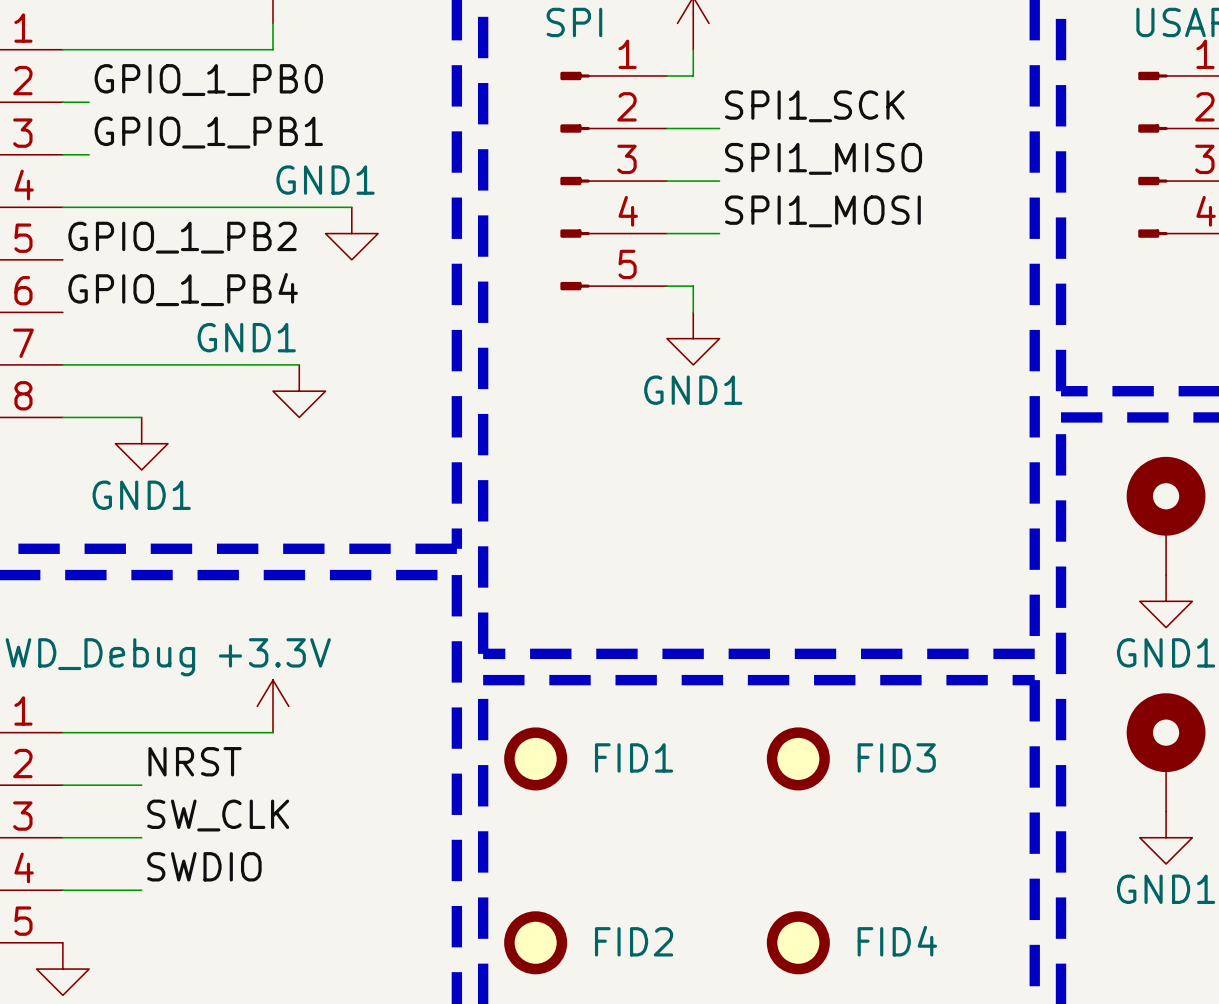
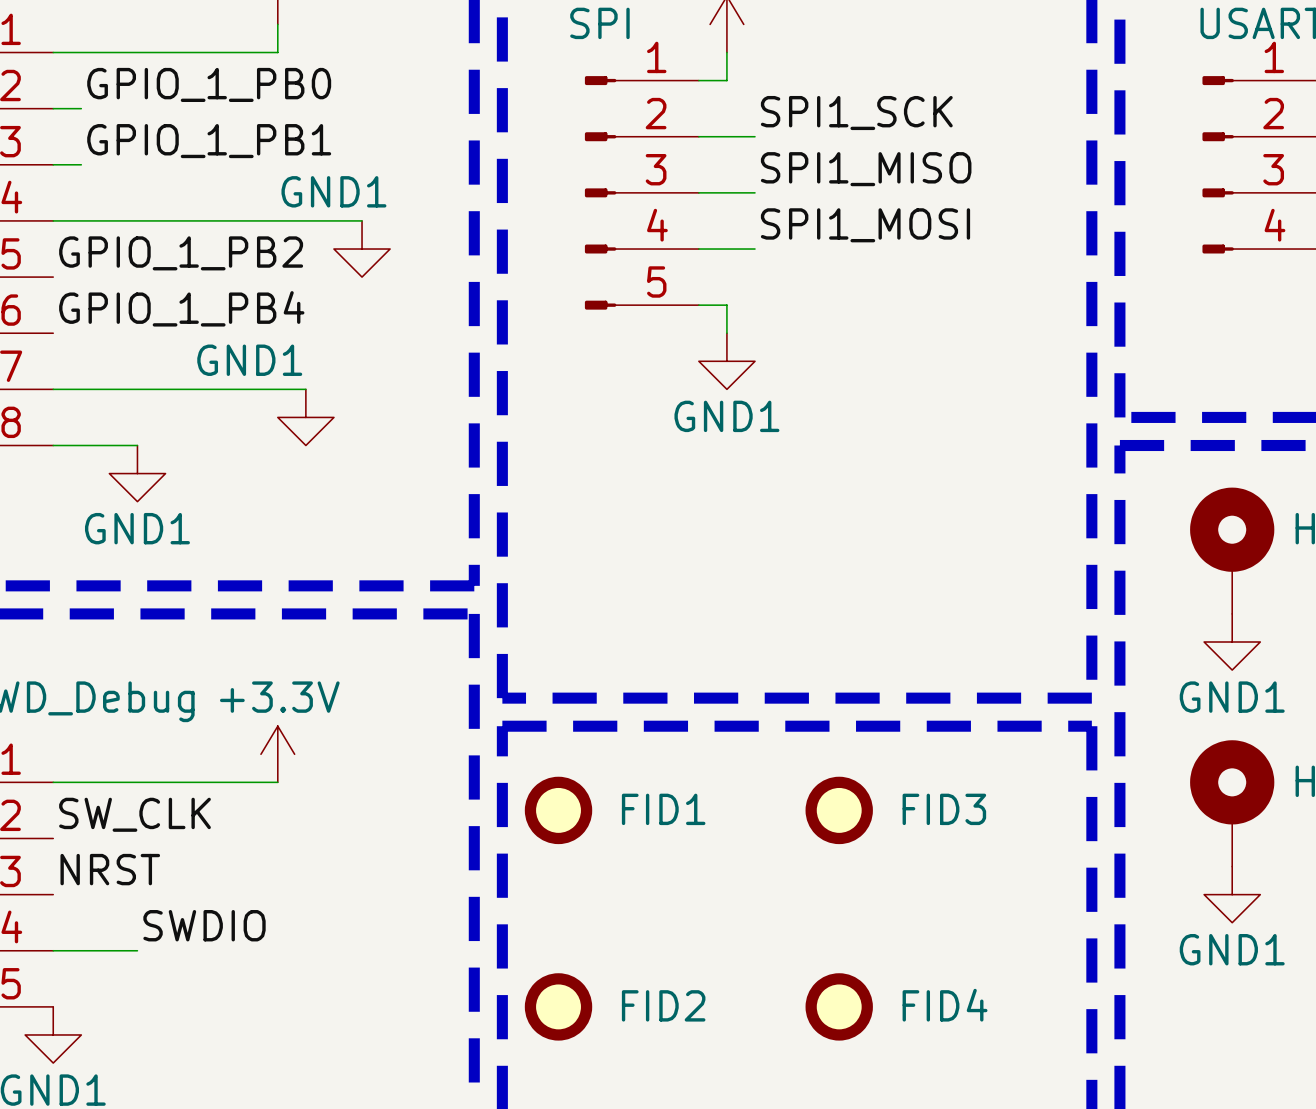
label position: NRST (195, 761) -> NRST (110, 869)
wire: (62, 785) (141, 785) -> none
label position: SW_CLK (218, 815) -> SW_CLK (134, 814)
wire: (62, 837) (141, 837) -> none

